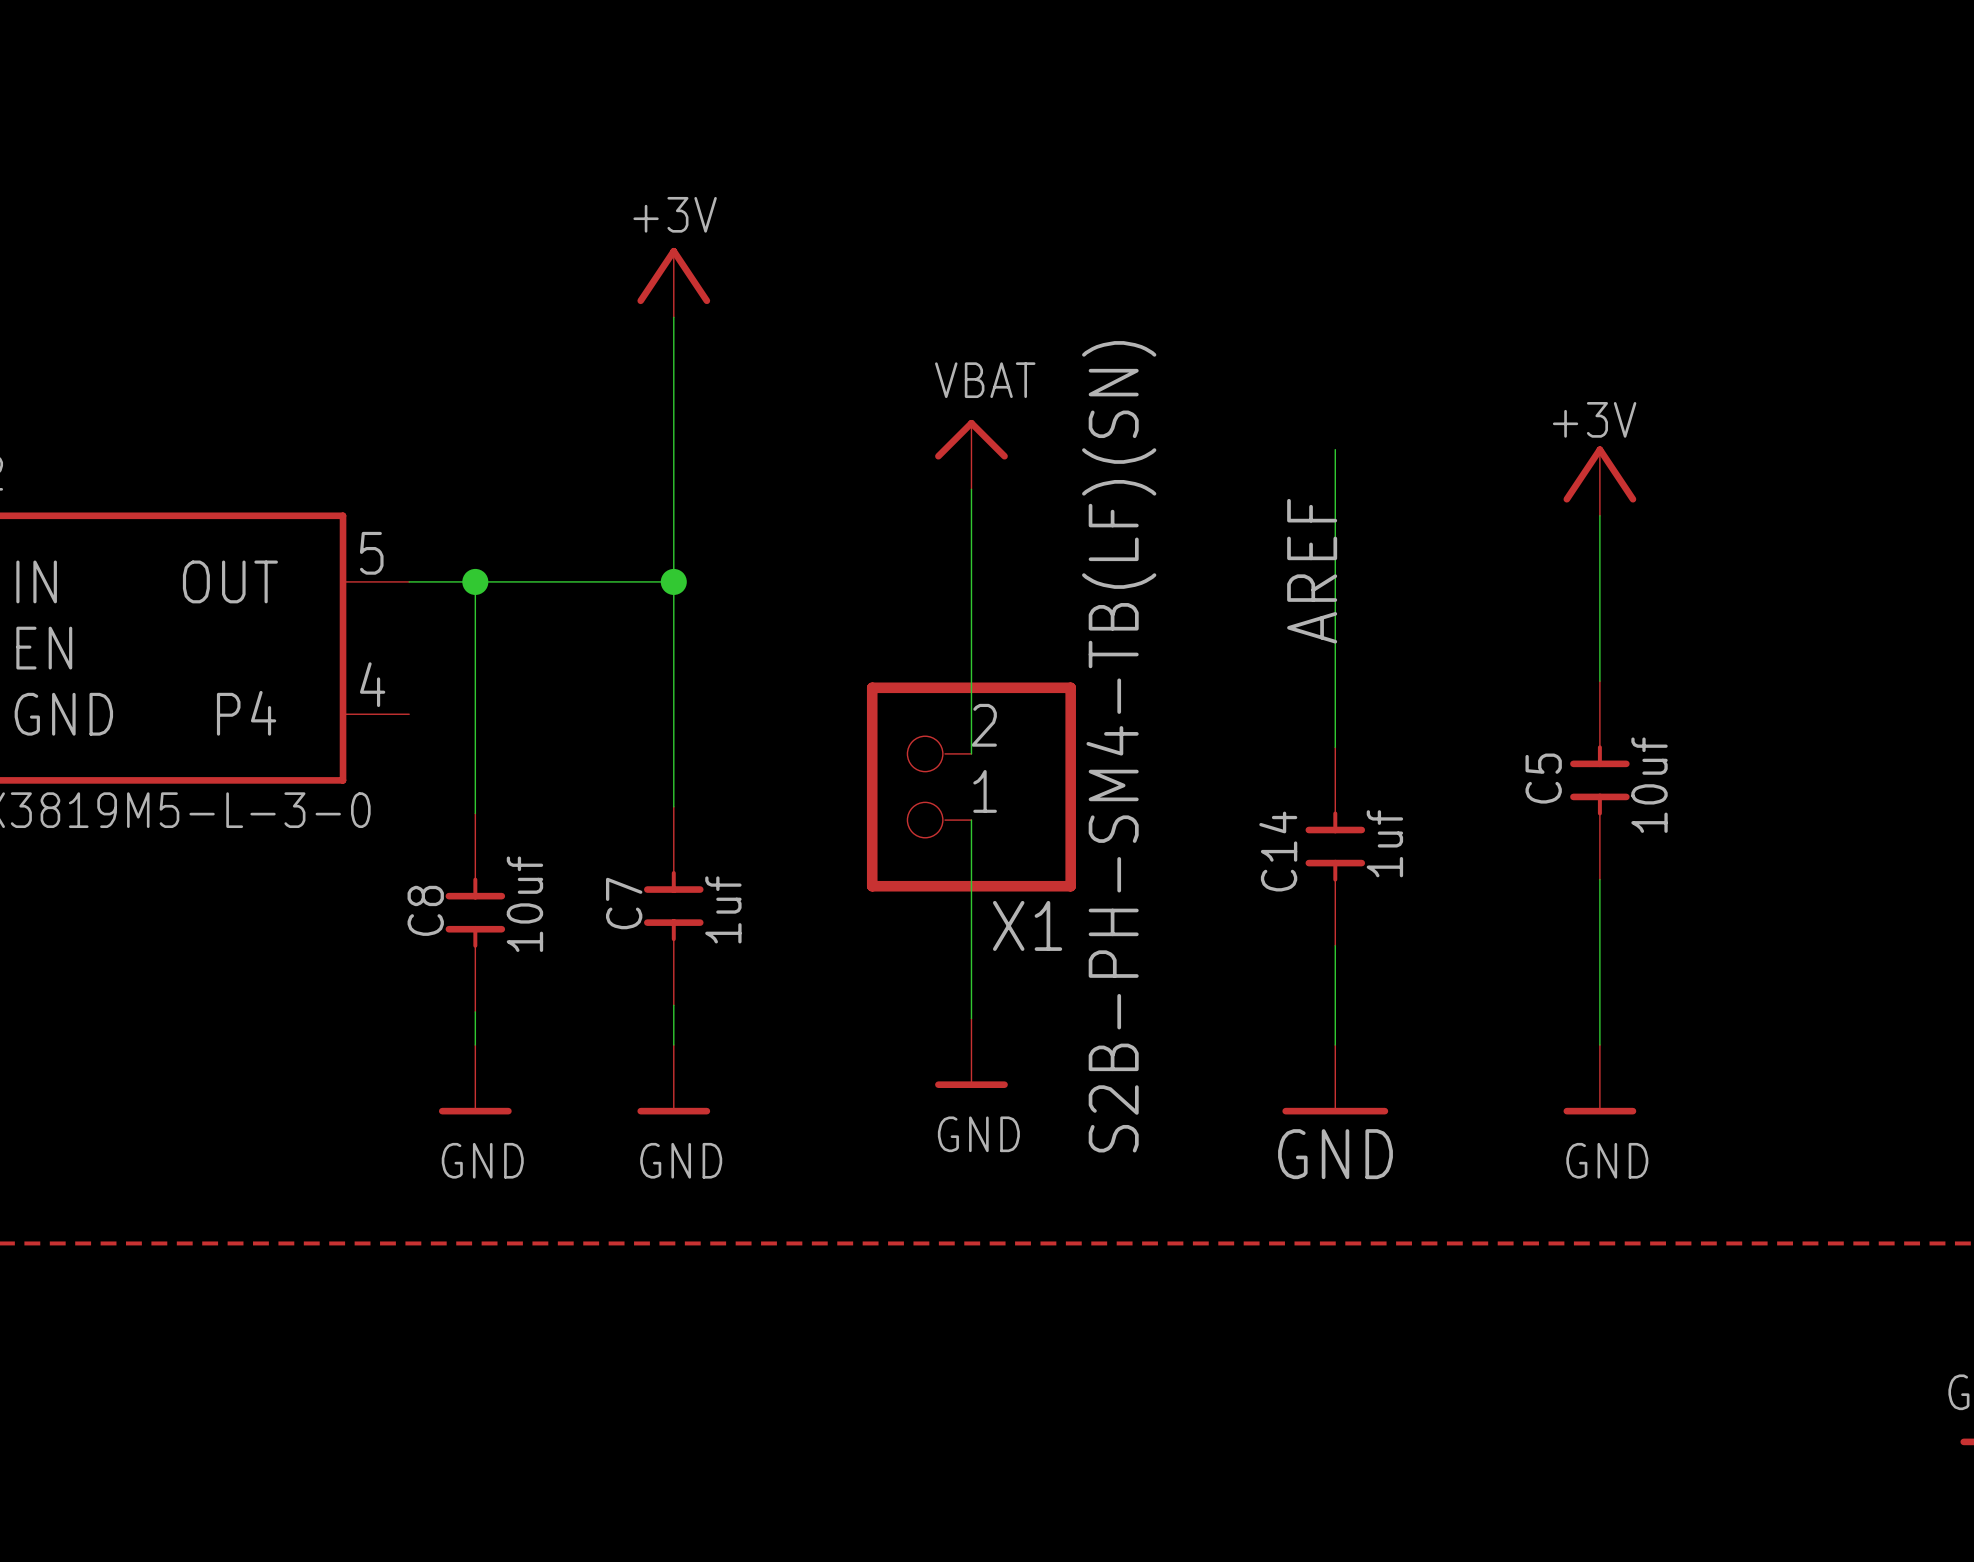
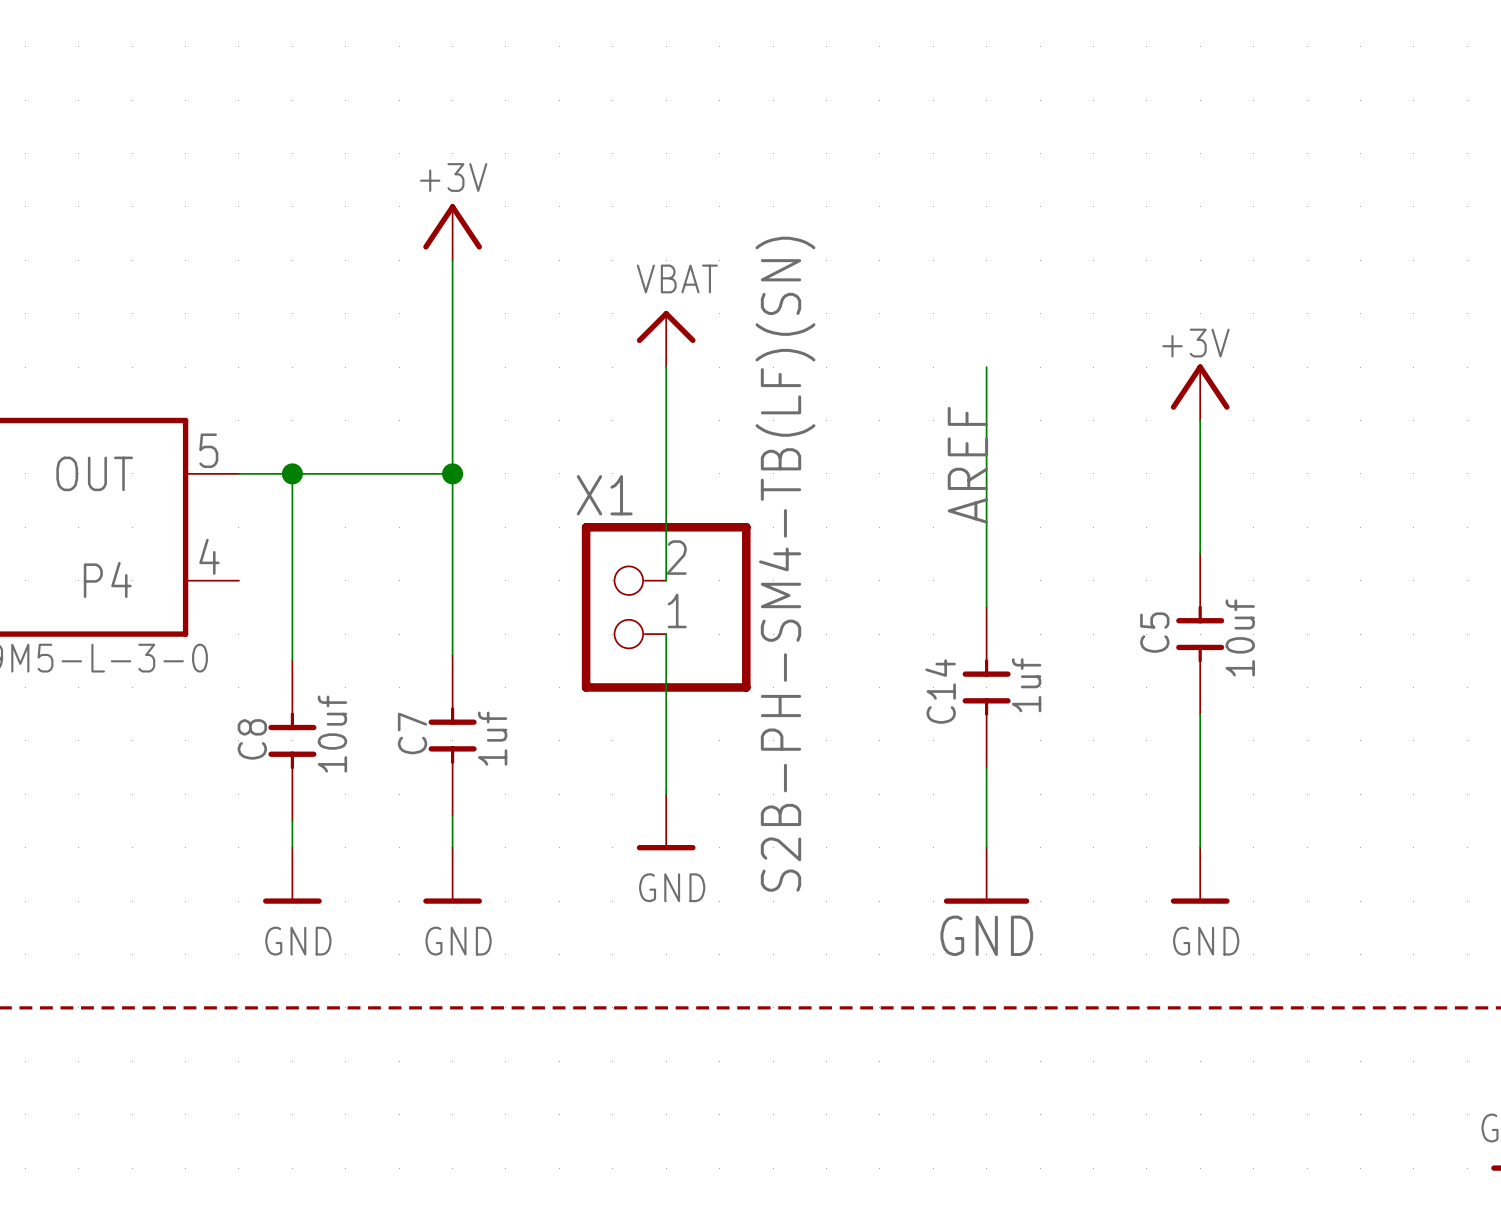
power symbol position: VBAT (971, 454) -> VBAT (666, 339)
wire: (971, 489) (971, 753) -> (666, 367) (666, 580)
X1 value position: S2B-PH-SM4-TB(LF)(SN) (1119, 746) -> S2B-PH-SM4-TB(LF)(SN) (785, 564)
X1 position: (971, 787) -> (666, 607)
wire: (971, 820) (971, 1018) -> (666, 634) (666, 794)
X1 name position: X1 (1027, 925) -> X1 (604, 495)
power symbol position: GND (971, 1053) -> GND (666, 822)

